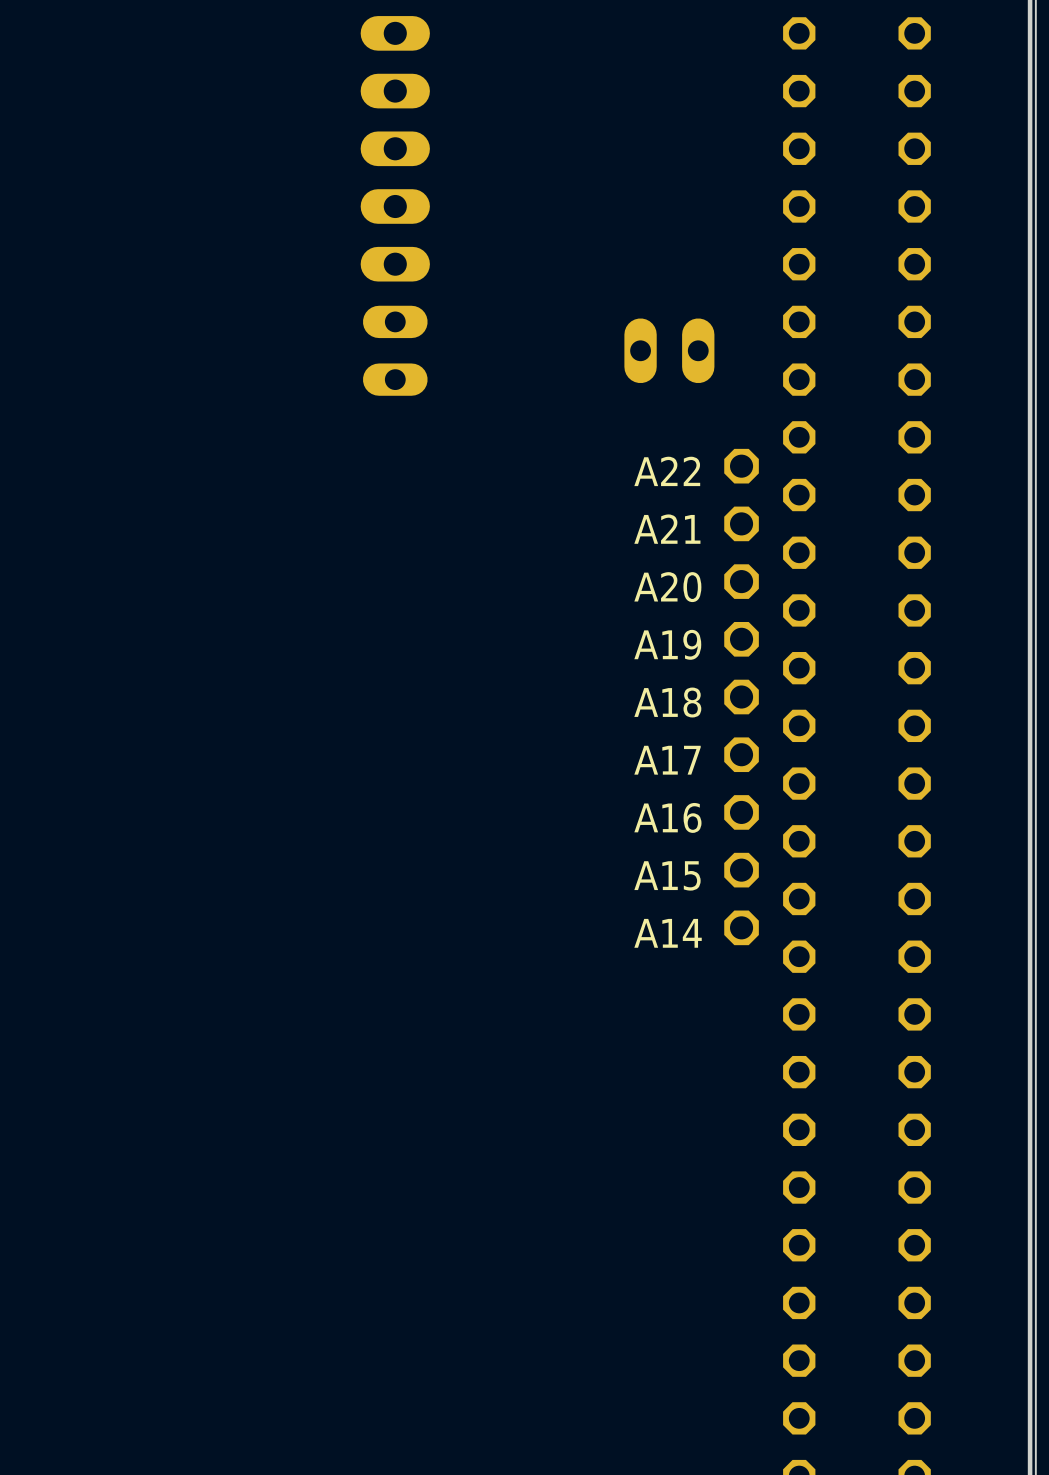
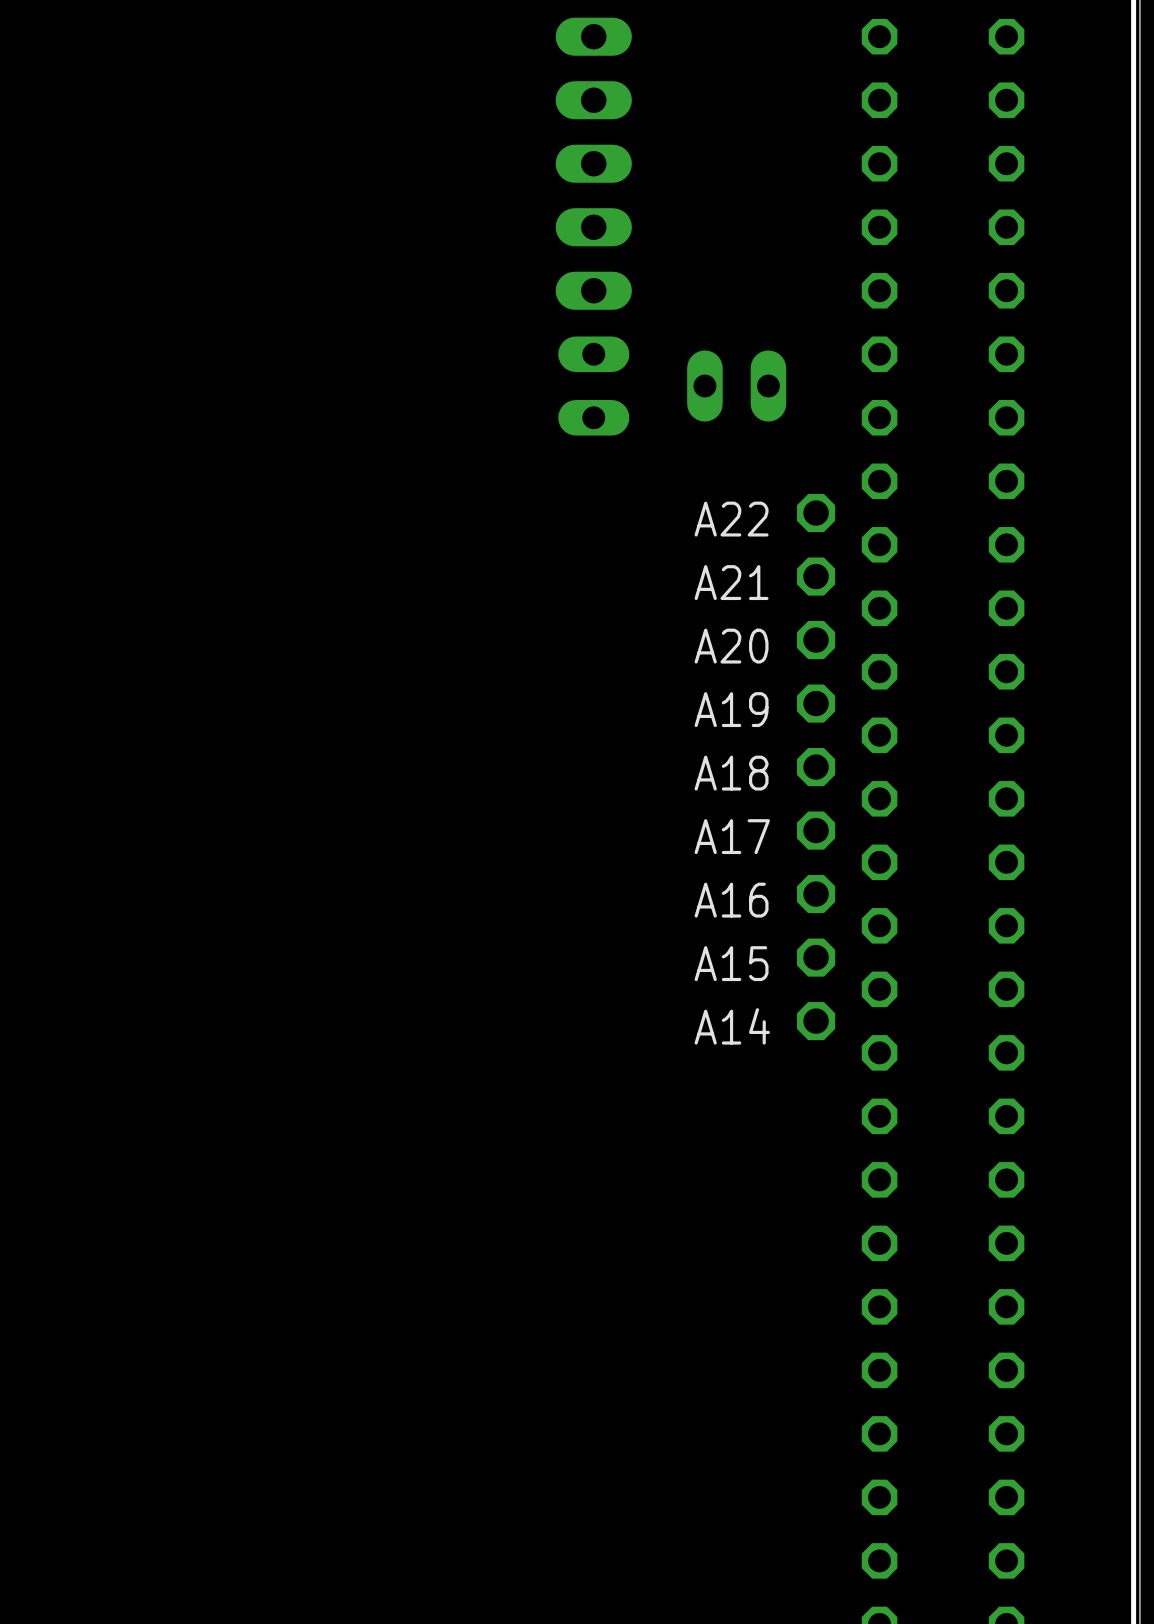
part position: (395, 148) -> (593, 163)
part position: (395, 350) -> (593, 386)

